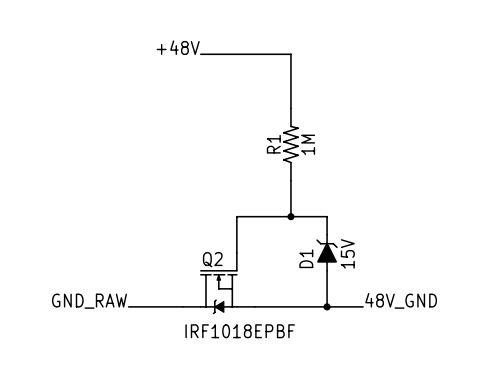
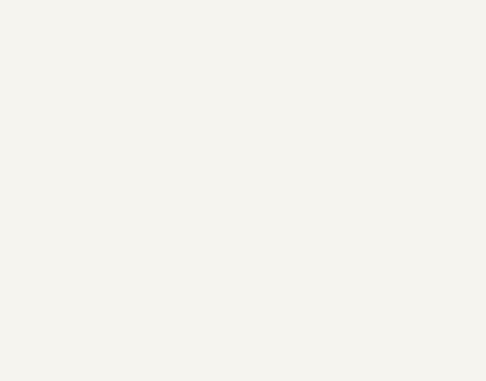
label: +48V (178, 47) -> none
wire: (200, 54) (290, 54) (290, 108) -> none
R1: 1M (290, 144) -> none
wire: (290, 180) (290, 216) -> none
junction: (290, 216) -> none
wire: (327, 234) (327, 216) (236, 216) (236, 252) -> none
D1: 15V (327, 252) -> none
wire: (327, 270) (327, 306) -> none
Q2: IRF1018EPBF (218, 283) -> none
label: 48V_GND (401, 300) -> none
label: GND_RAW (89, 301) -> none
wire: (128, 306) (182, 306) -> none
wire: (254, 306) (363, 306) -> none
junction: (327, 306) -> none

